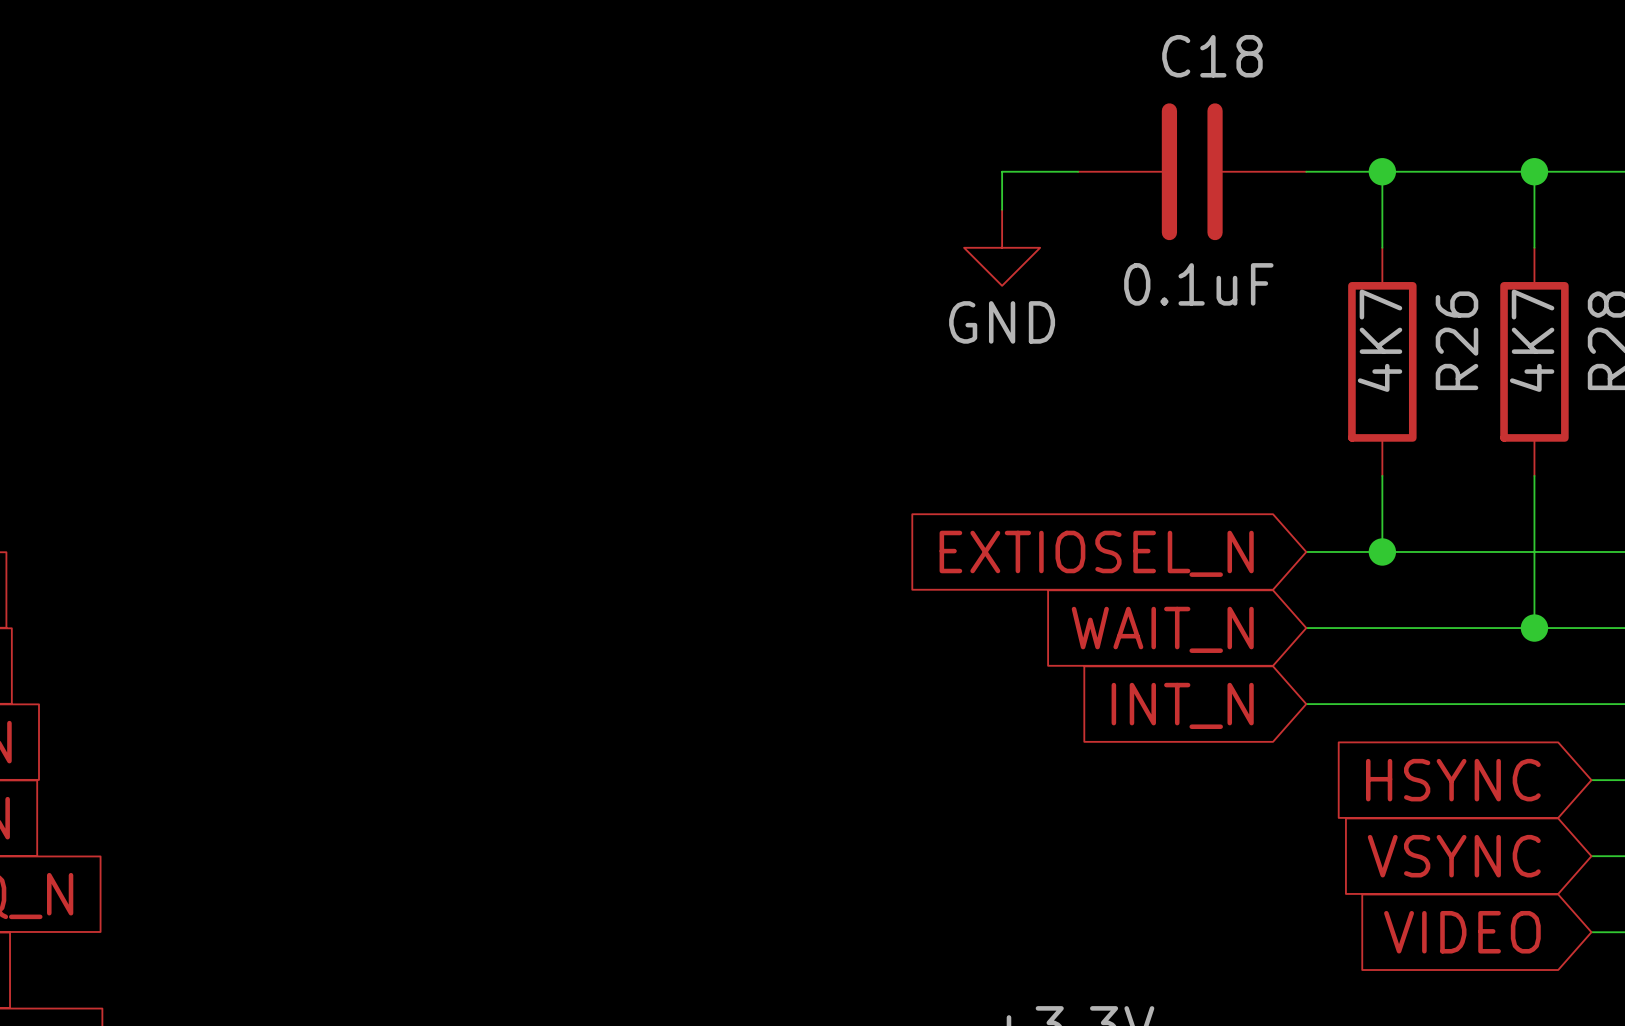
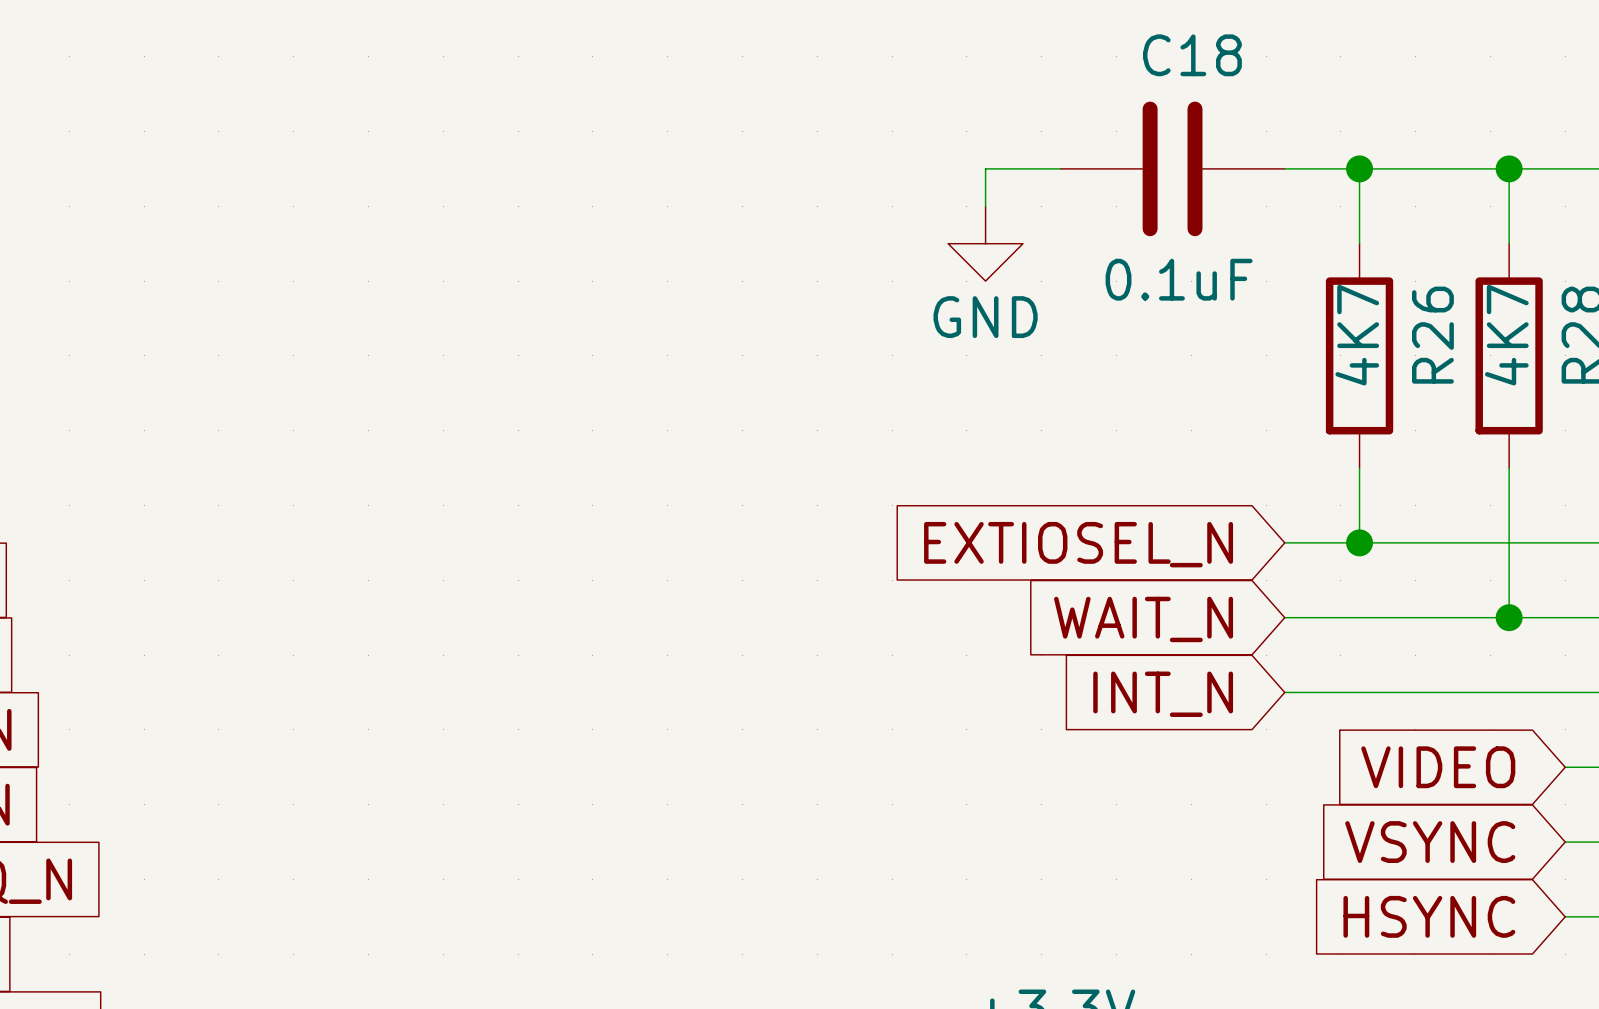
global label: HSYNC (1453, 780) -> VIDEO (1438, 767)
global label: VIDEO (1462, 932) -> HSYNC (1429, 916)

